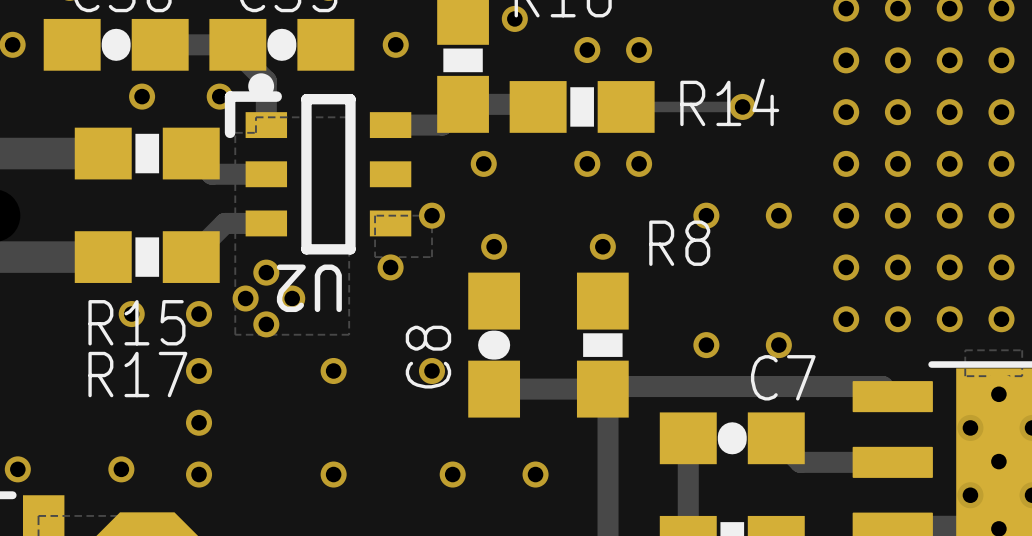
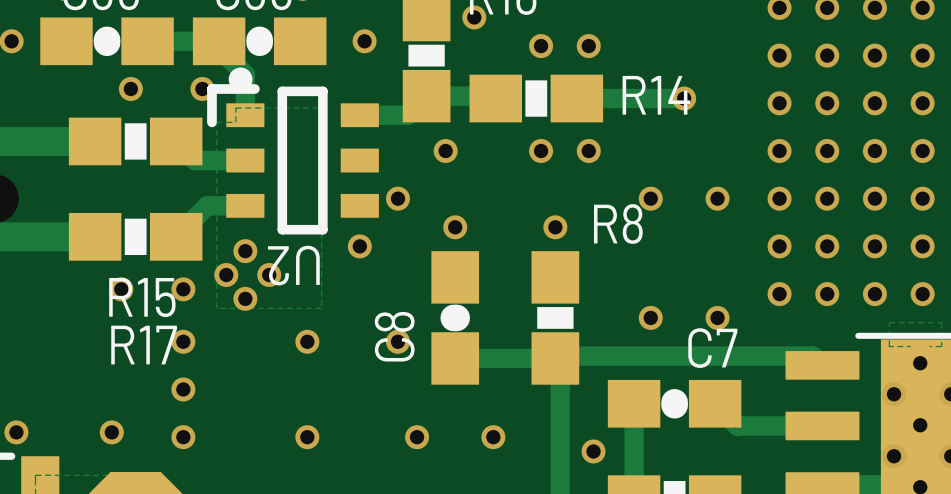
track width: thin (742, 106) (626, 106) -> thick (684, 98) (576, 98)
zone outline: (432, 215) (432, 257) (375, 257) (375, 215) (432, 215) -> none
via: none -> (593, 451)

